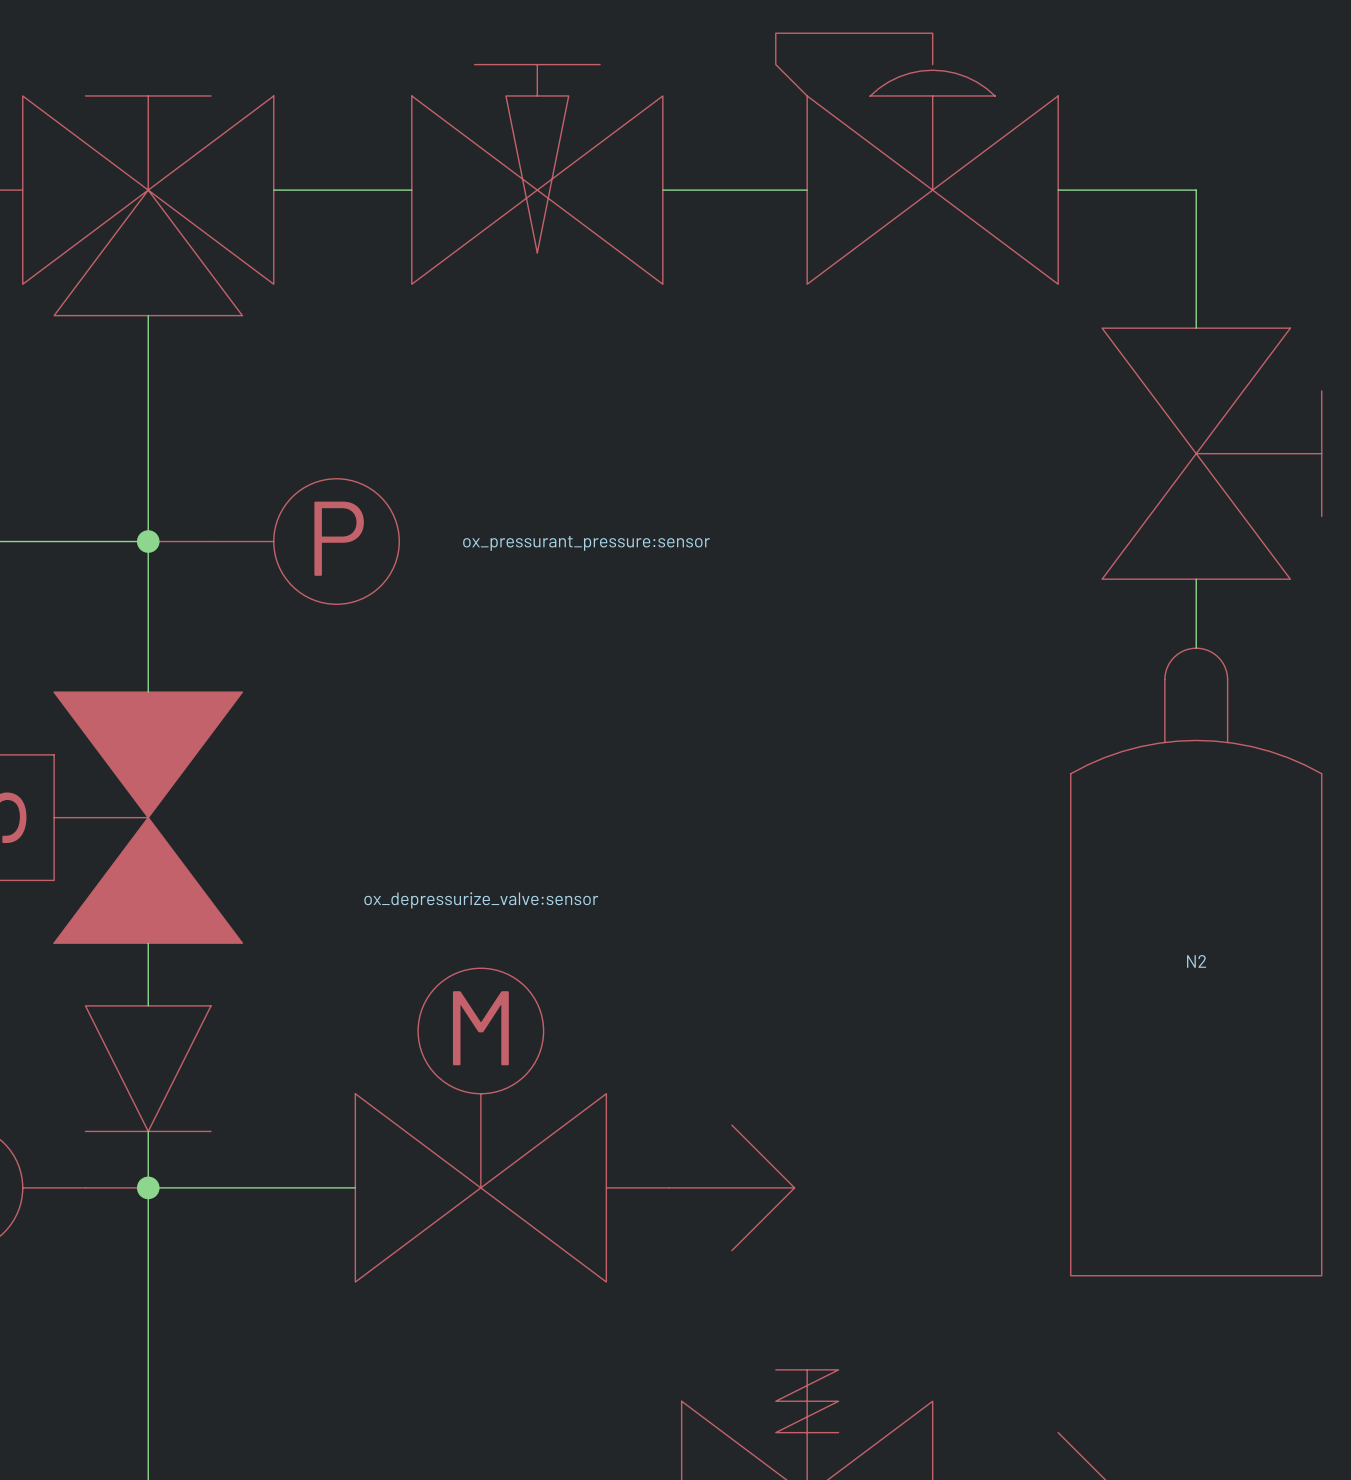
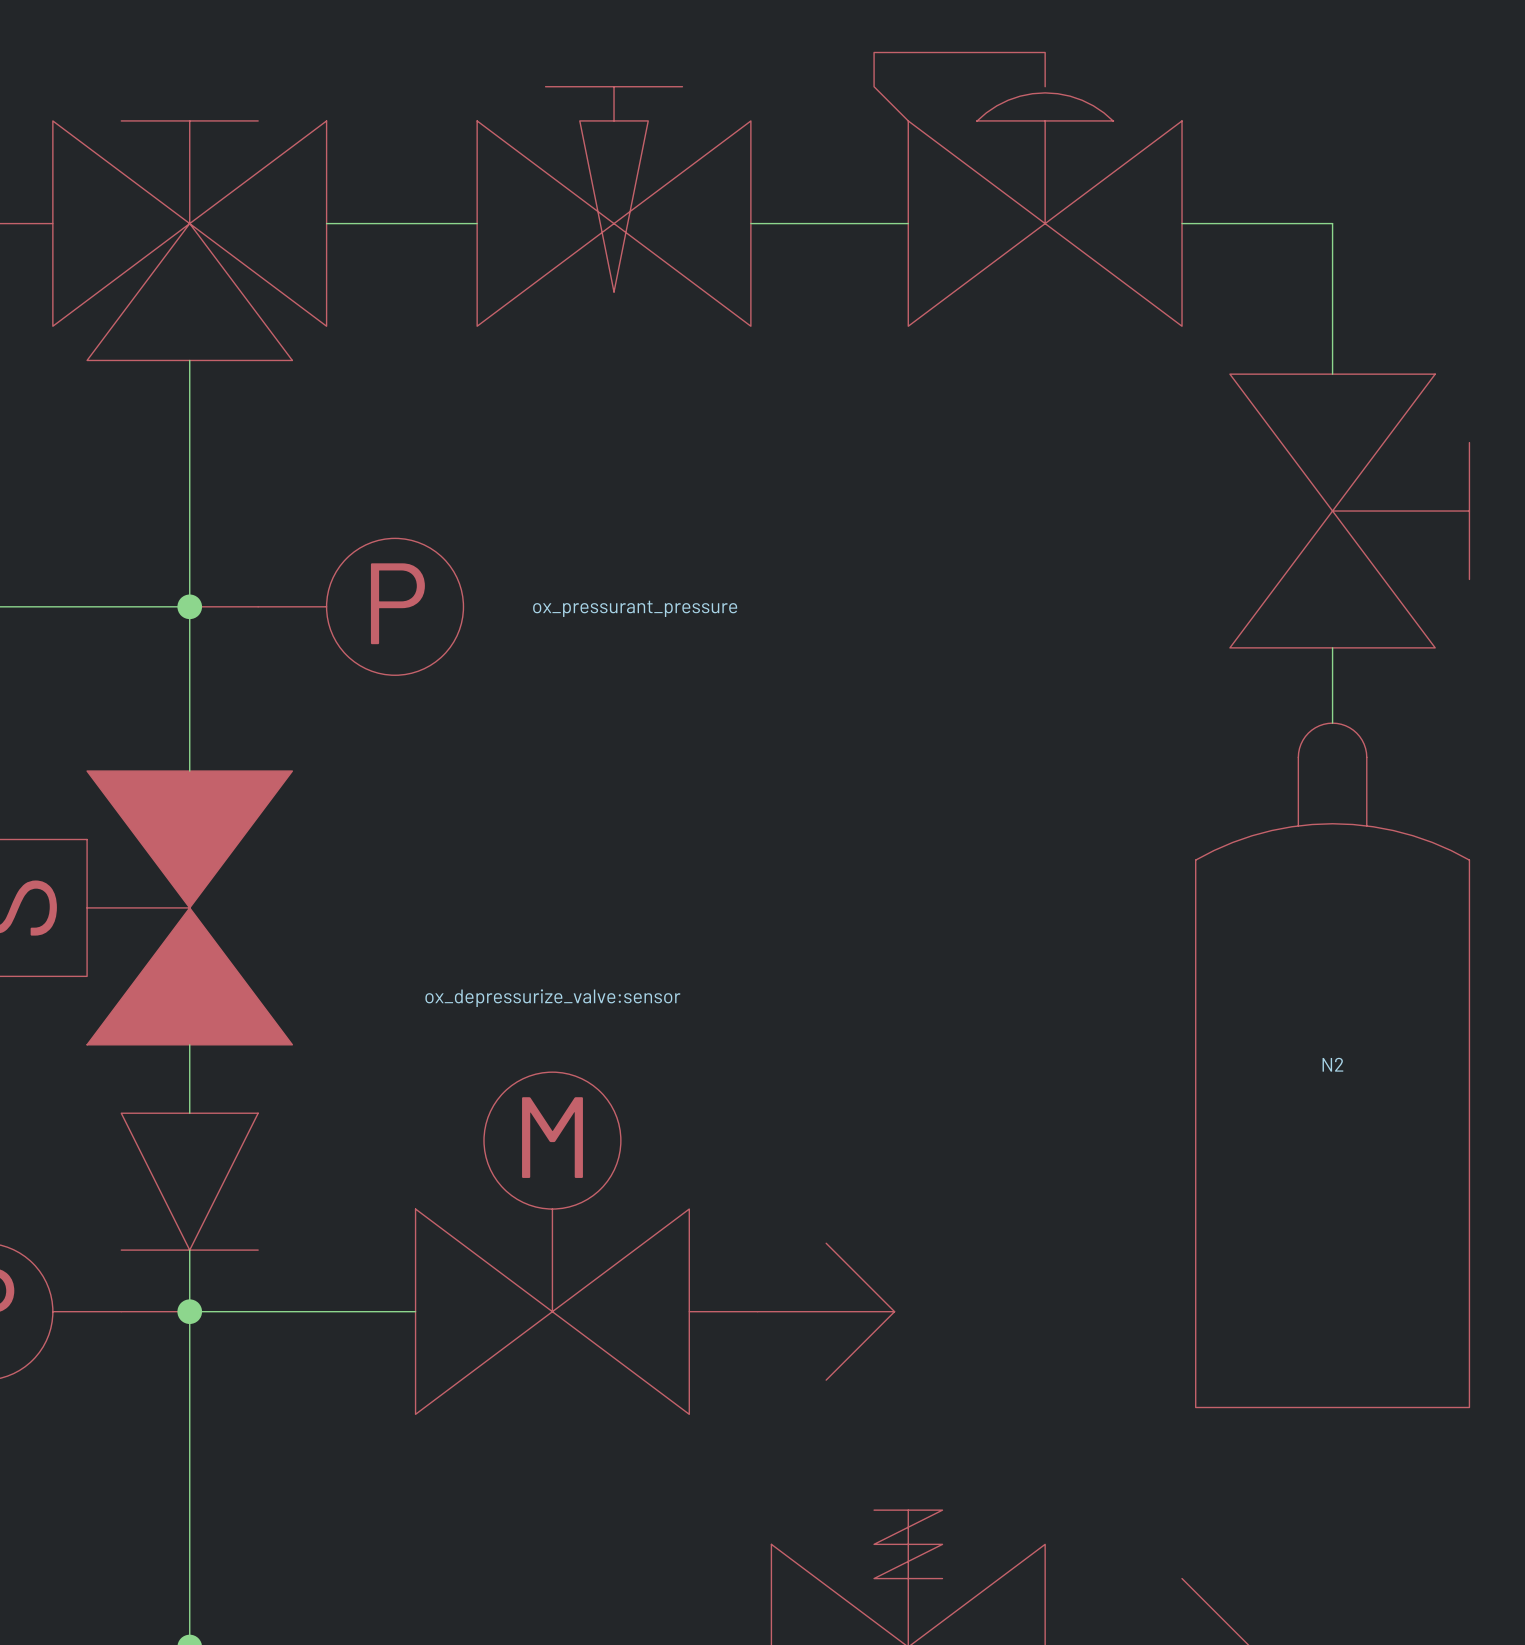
part value: ox_pressurant_pressure:sensor (586, 543) -> ox_pressurant_pressure (635, 608)

